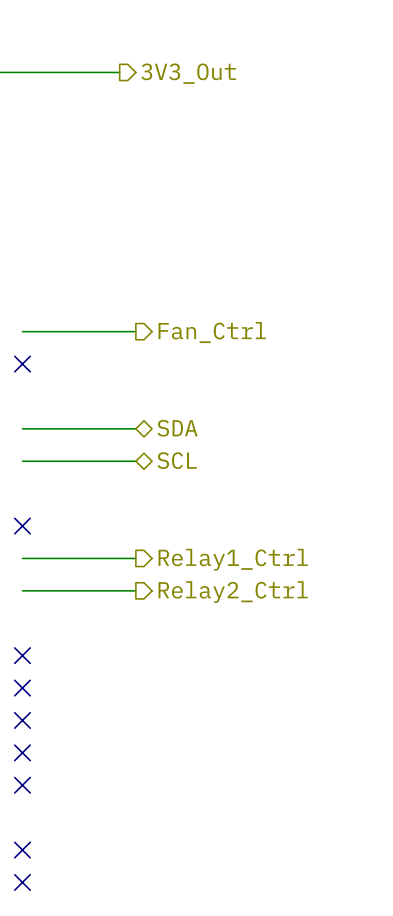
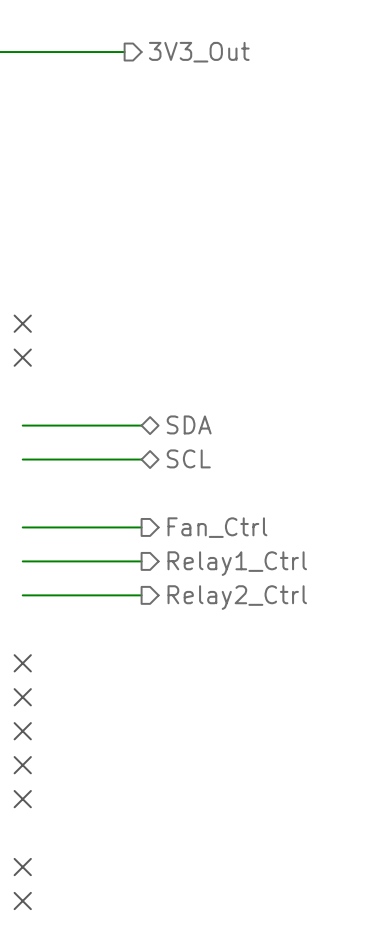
wire: (22, 331) (135, 331) -> (22, 527) (141, 527)
no-connect mark: none -> (22, 323)
hierarchical label position: Fan_Ctrl (212, 332) -> Fan_Ctrl (217, 527)
no-connect mark: (22, 526) -> none

